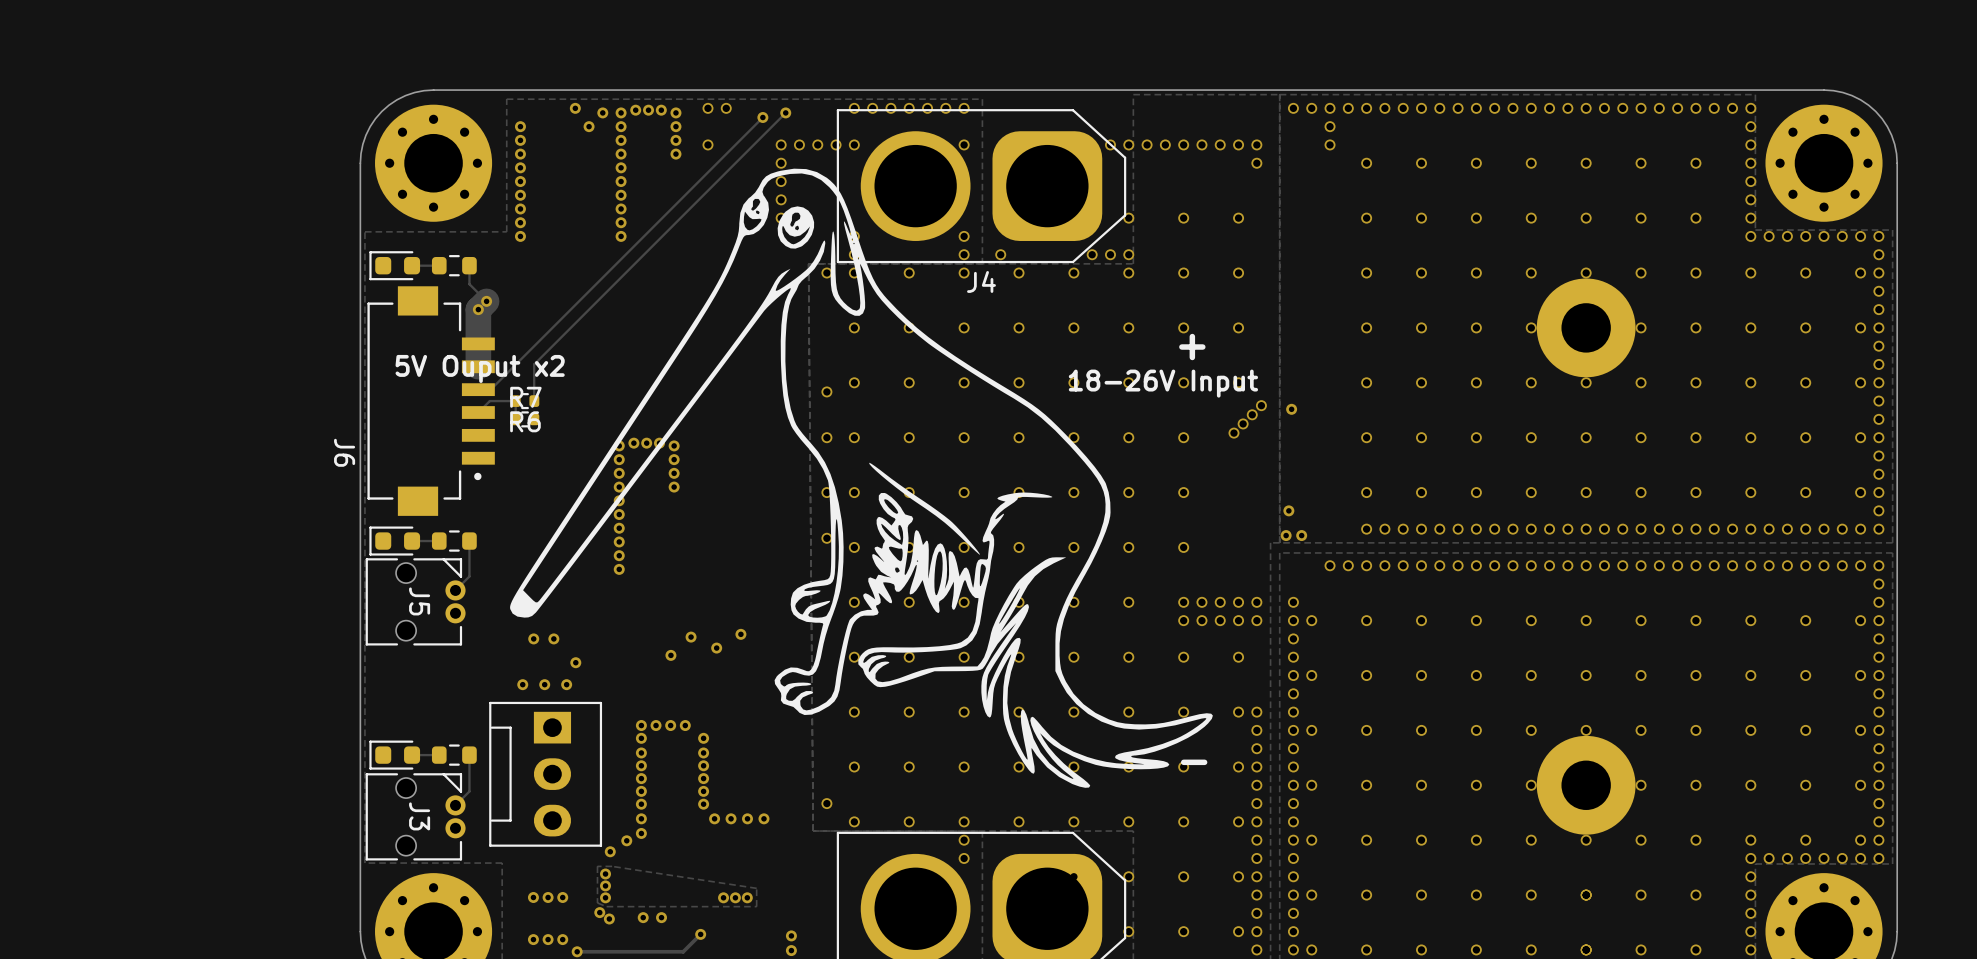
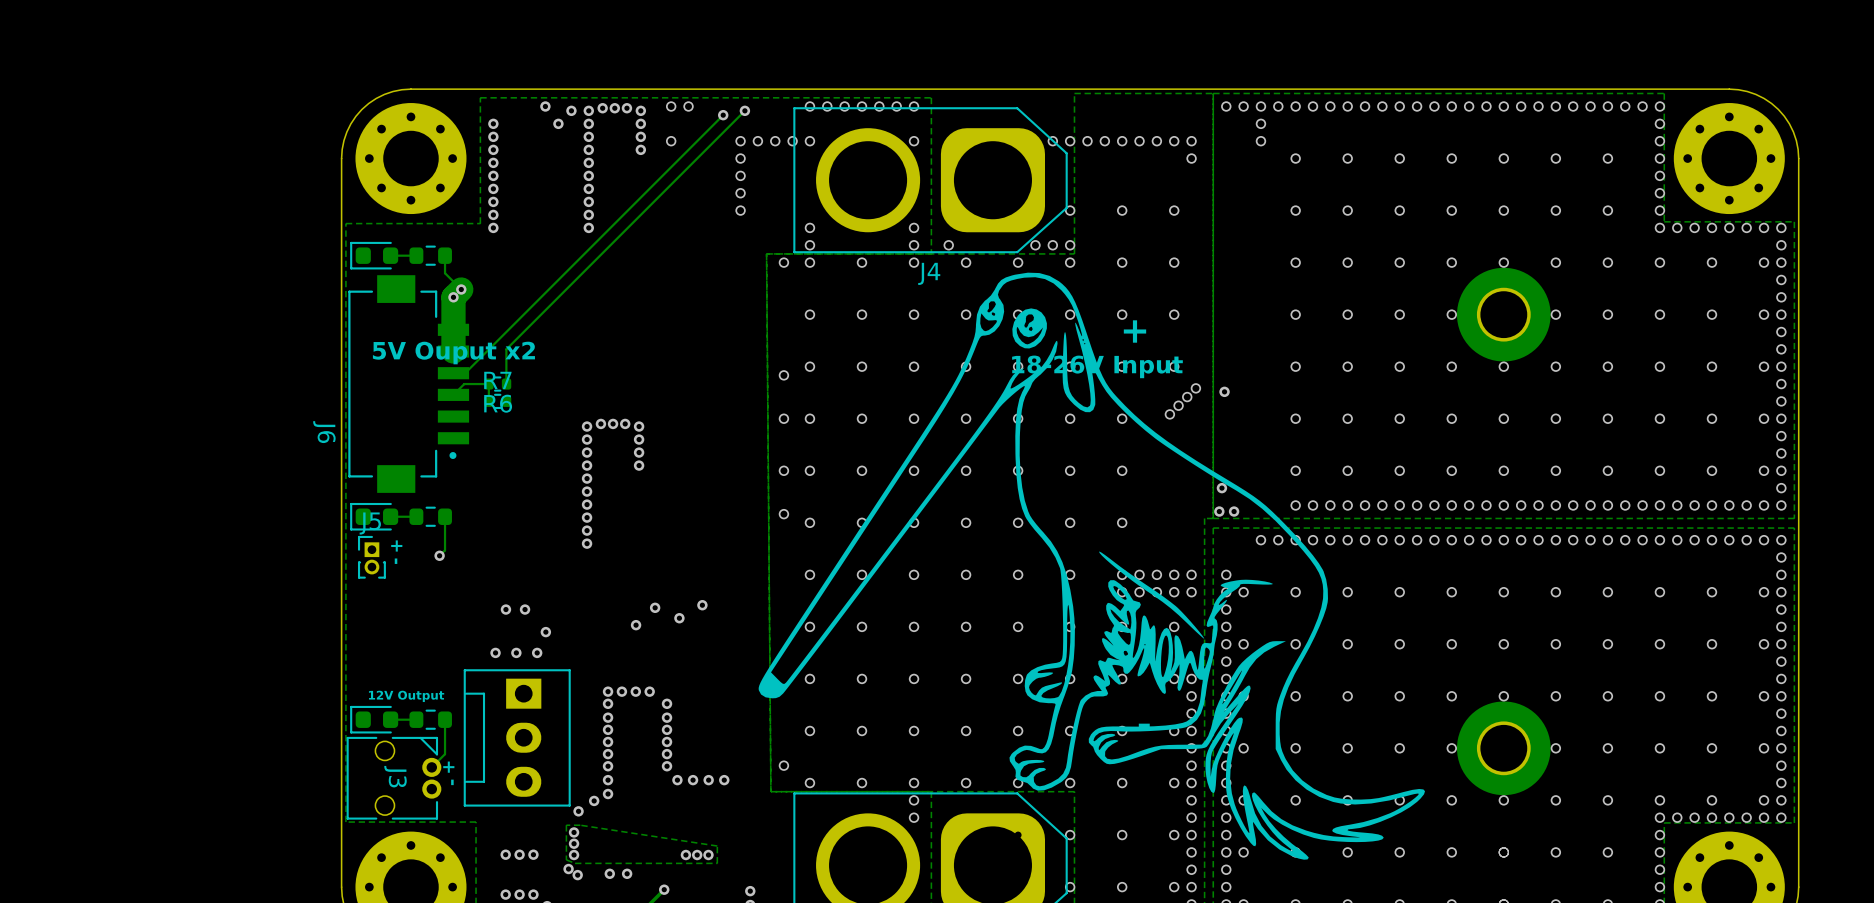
drawing position: (861, 478) -> (1091, 566)
J5 footprint: [365, 558, 466, 646] -> [357, 535, 386, 579]
text: none -> + (396, 545)
via: none -> (439, 555)
text: none -> - (396, 561)
J5 name position: J5 (419, 601) -> J5 (370, 523)
text: none -> 12V Output (406, 696)
text: none -> + (448, 767)
text: none -> - (452, 782)

